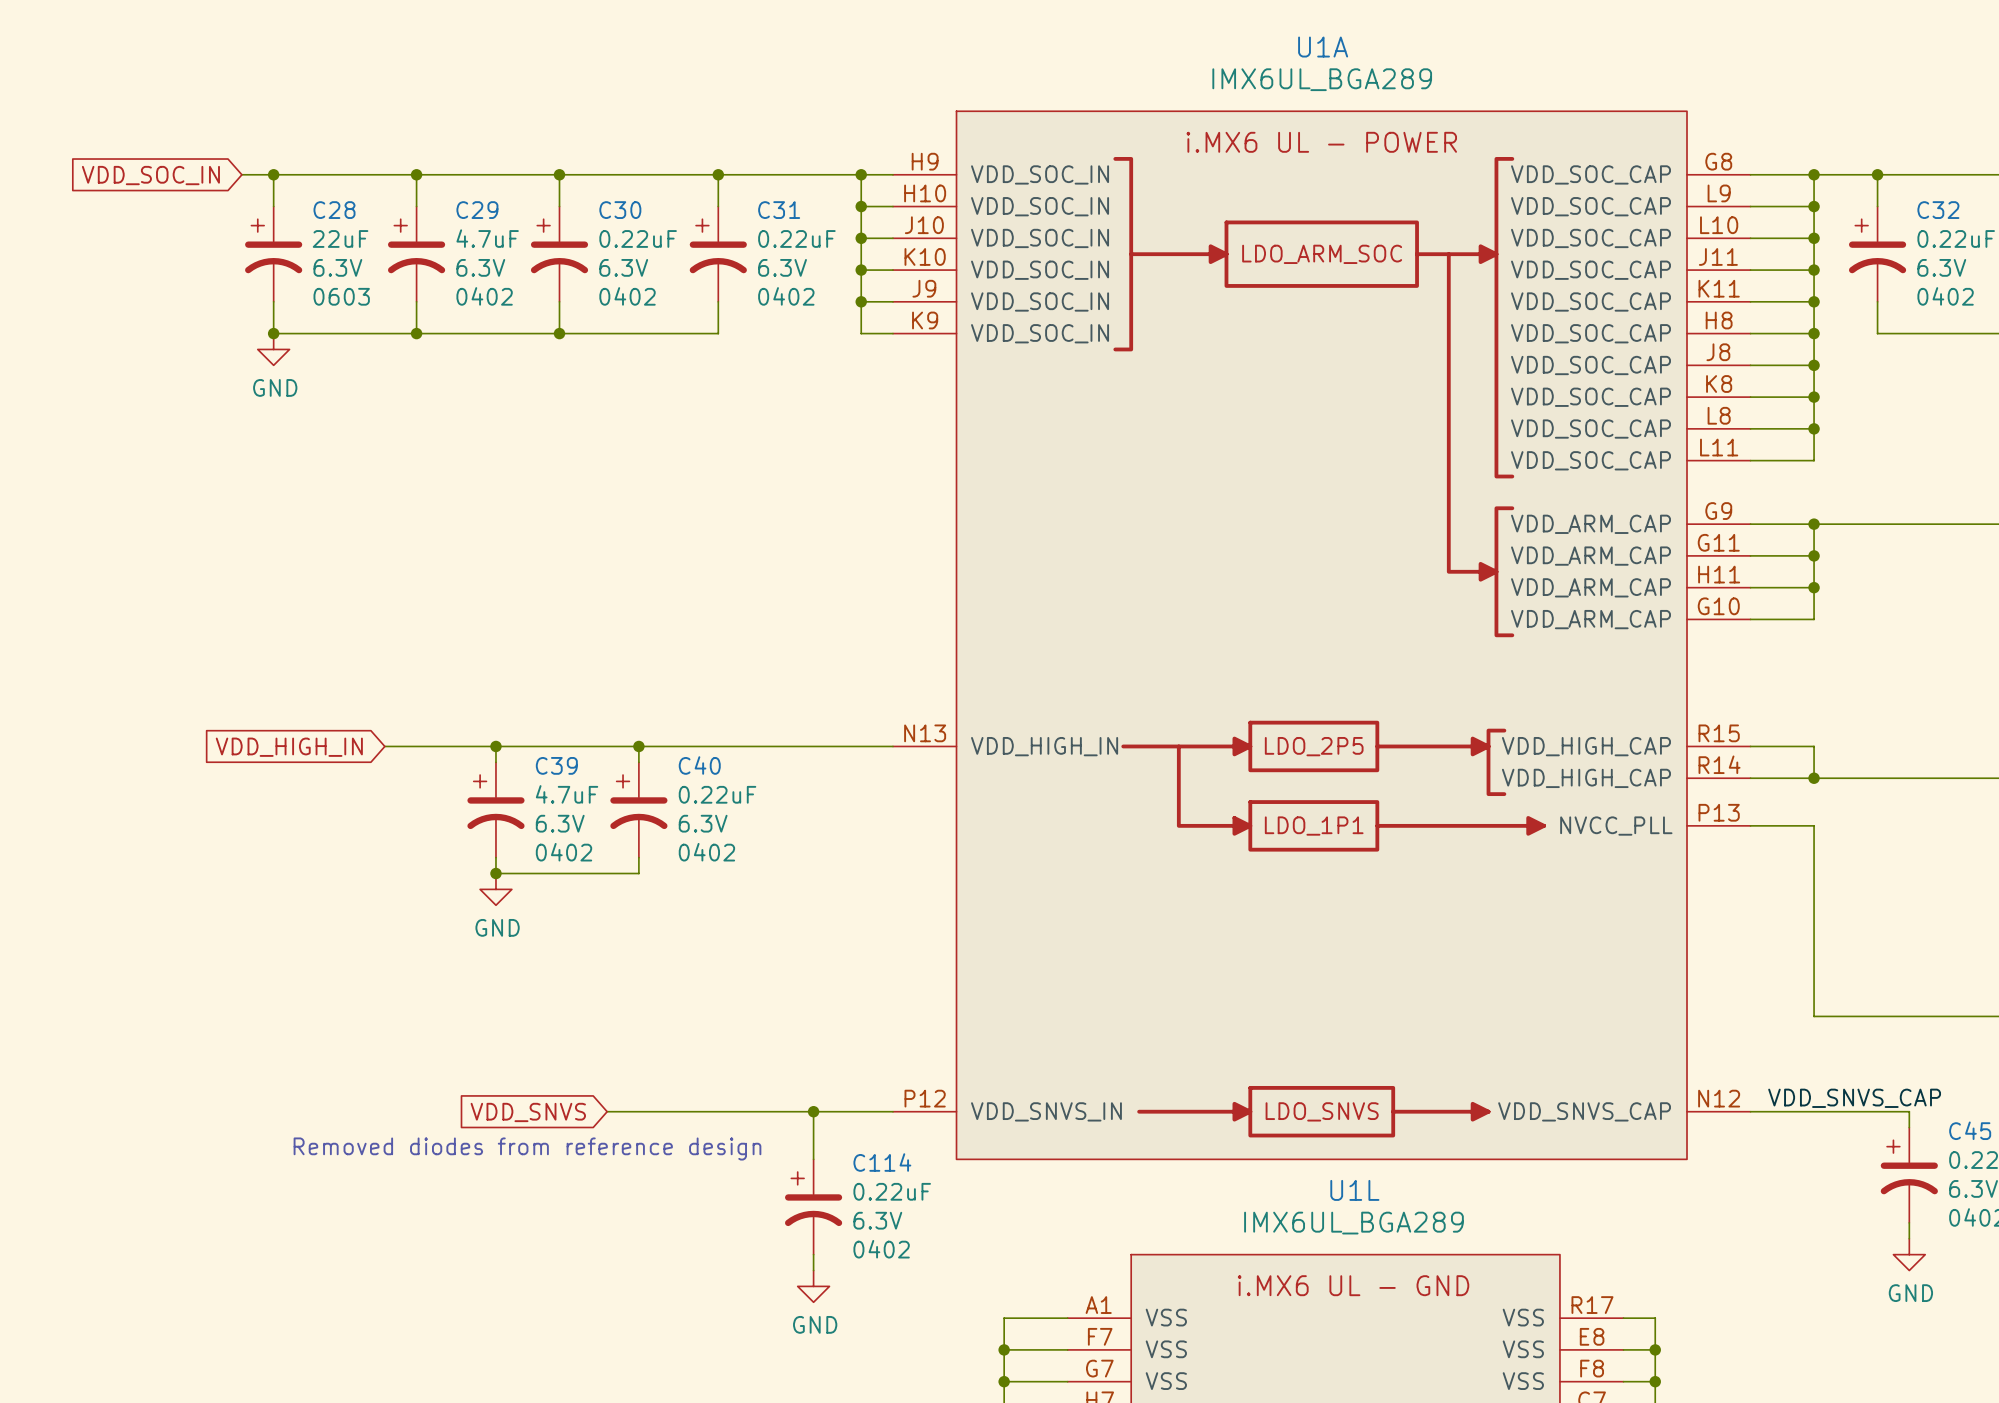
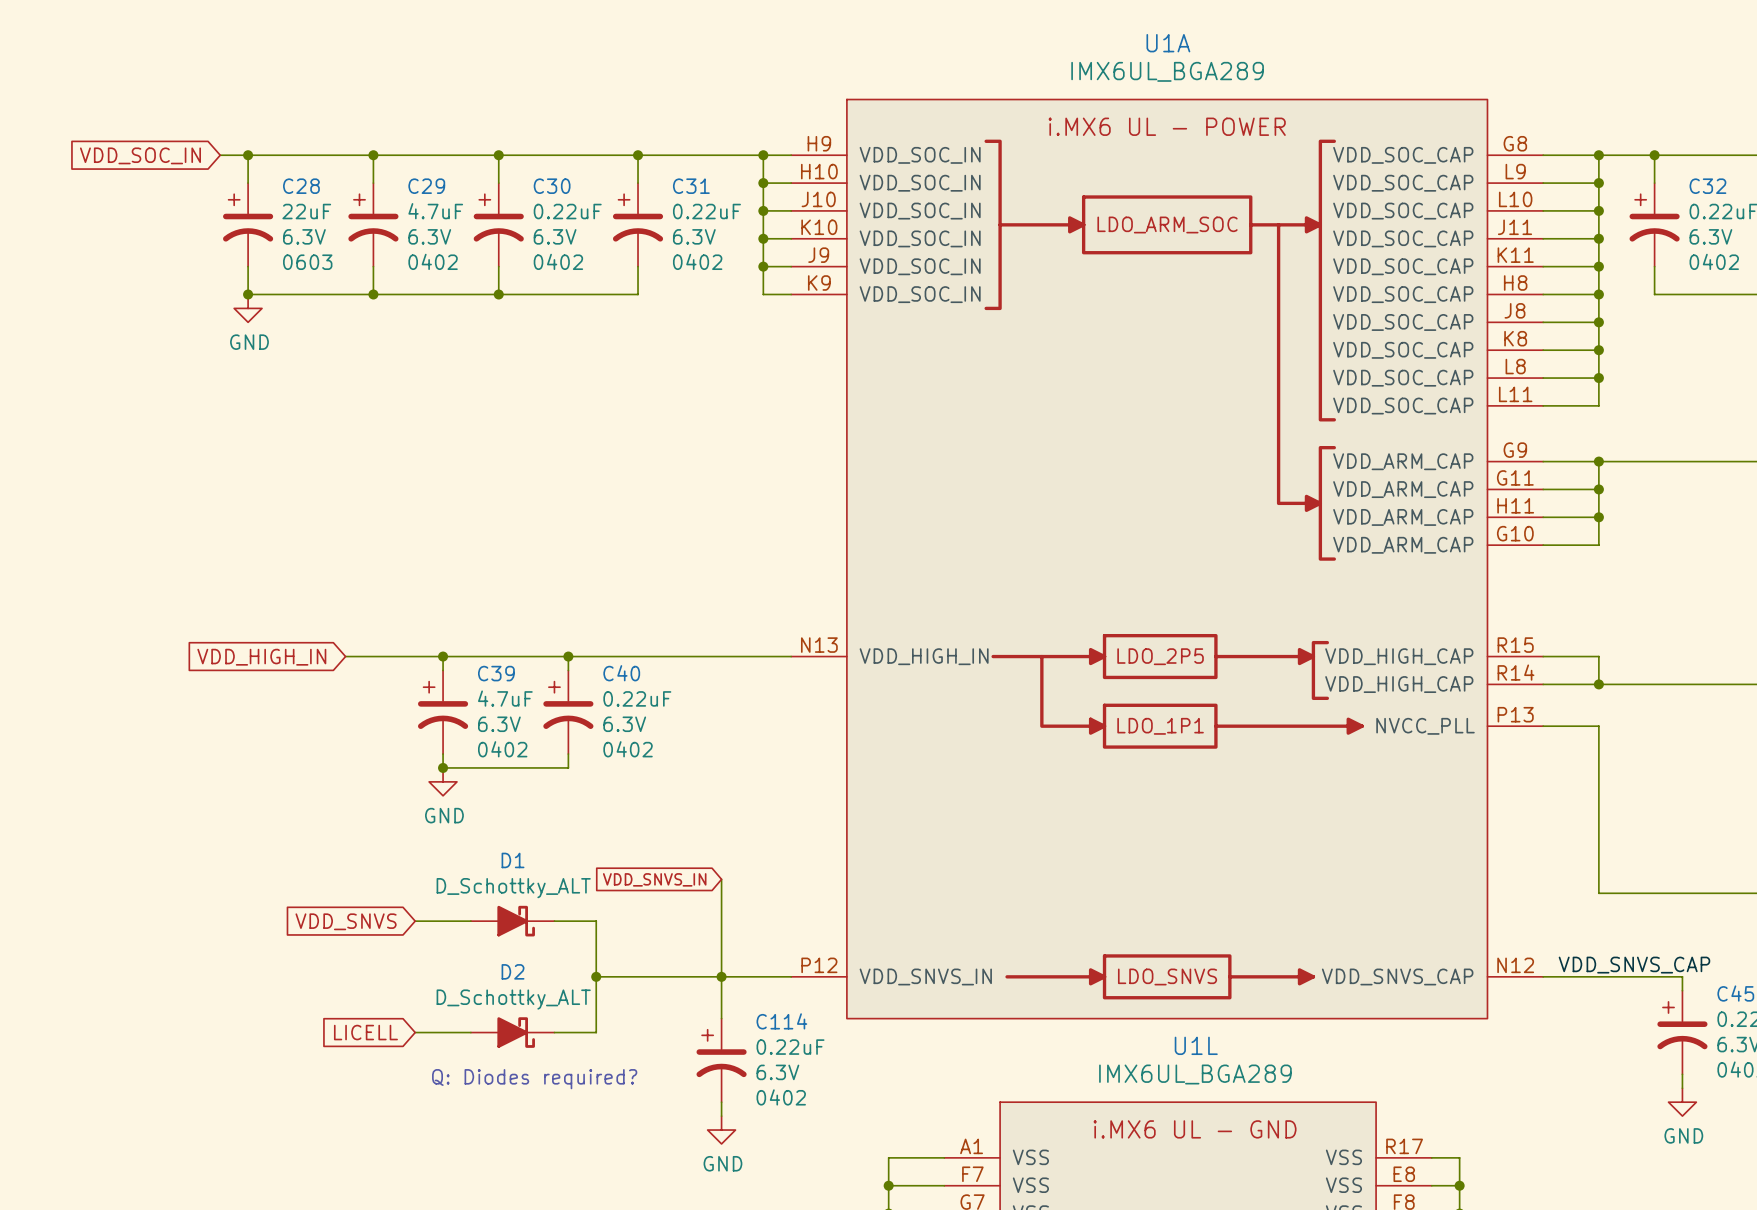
wire: none -> (721, 879) (721, 976)
global label: none -> VDD_SNVS_IN (654, 879)
D1: none -> D_Schottky_ALT (512, 921)
wire: none -> (554, 921) (596, 921) (596, 1032) (554, 1032)
wire: (607, 1111) (670, 1111) -> (415, 921) (470, 921)
junction: none -> (596, 976)
global label position: VDD_SNVS (528, 1112) -> VDD_SNVS (346, 921)
text: Removed diodes from reference design (527, 1148) -> none
global label: none -> LICELL (365, 1032)
wire: none -> (415, 1032) (470, 1032)
D2: none -> D_Schottky_ALT (512, 1032)
text: none -> Q: Diodes required? (534, 1079)

